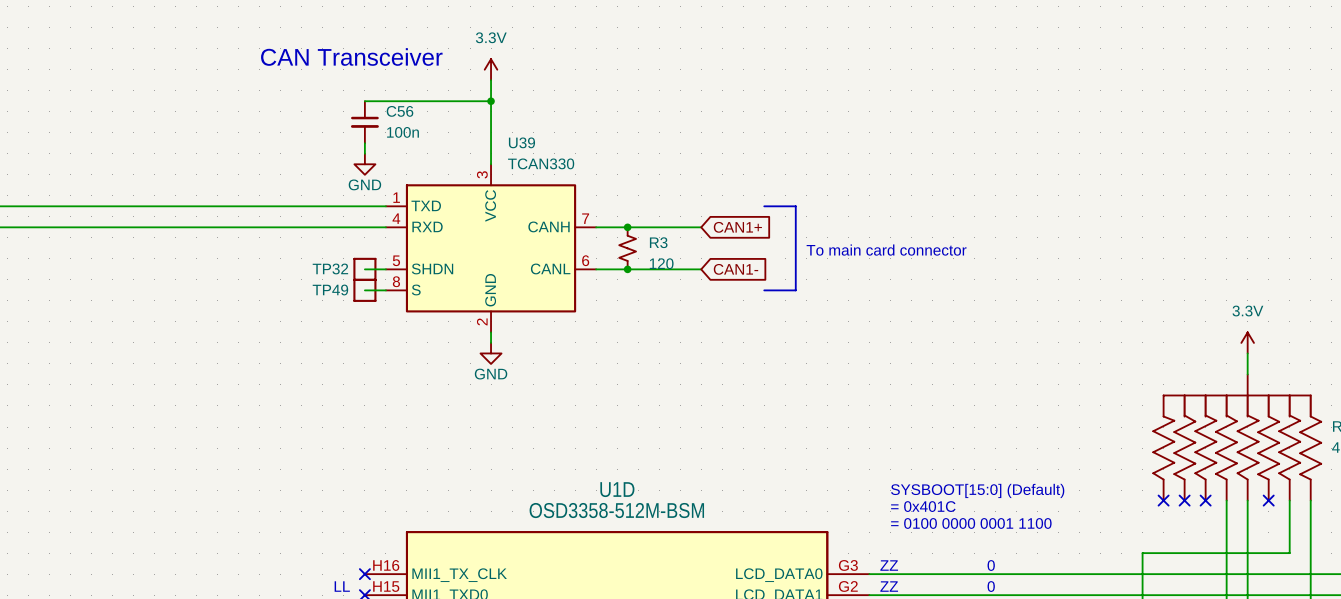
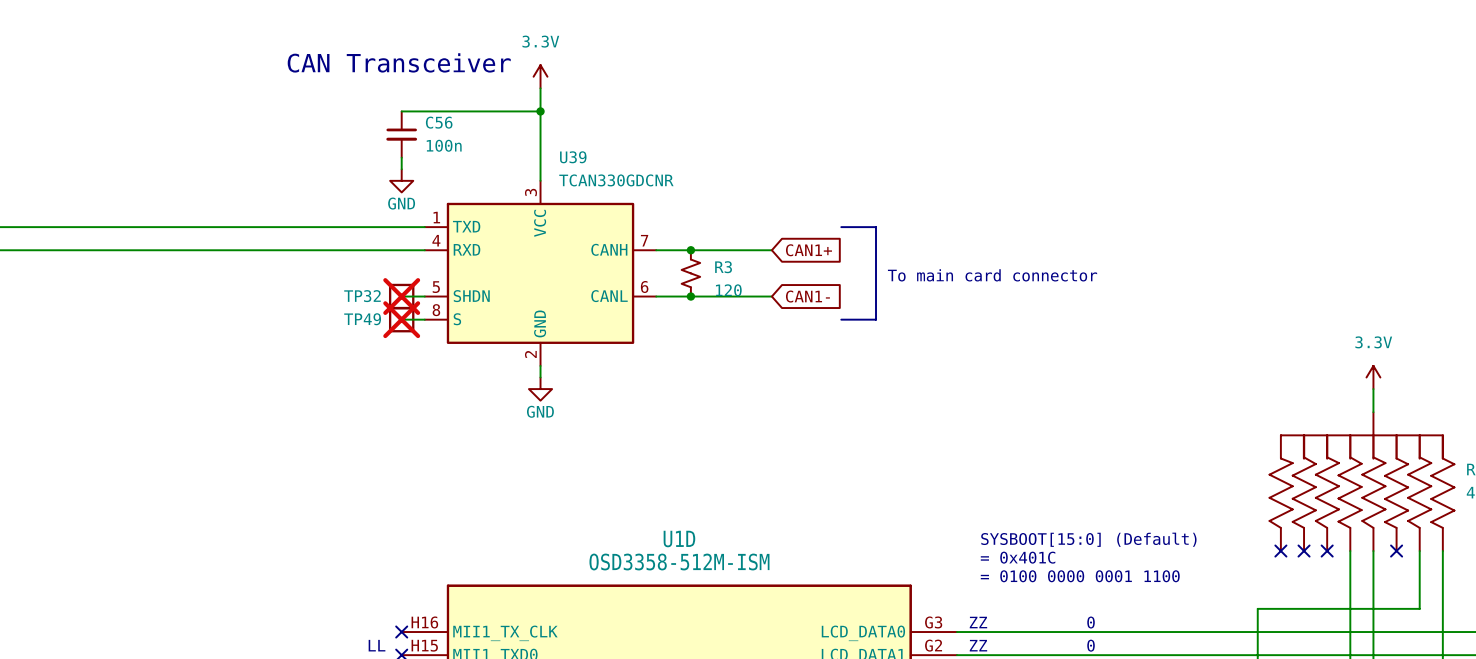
U39 value: TCAN330 (541, 163) -> TCAN330GDCNR (616, 180)
TP32 do-not-place cross: none -> (401, 296)
TP49 do-not-place cross: none -> (401, 319)
U1D value: OSD3358-512M-BSM (616, 510) -> OSD3358-512M-ISM (679, 562)

